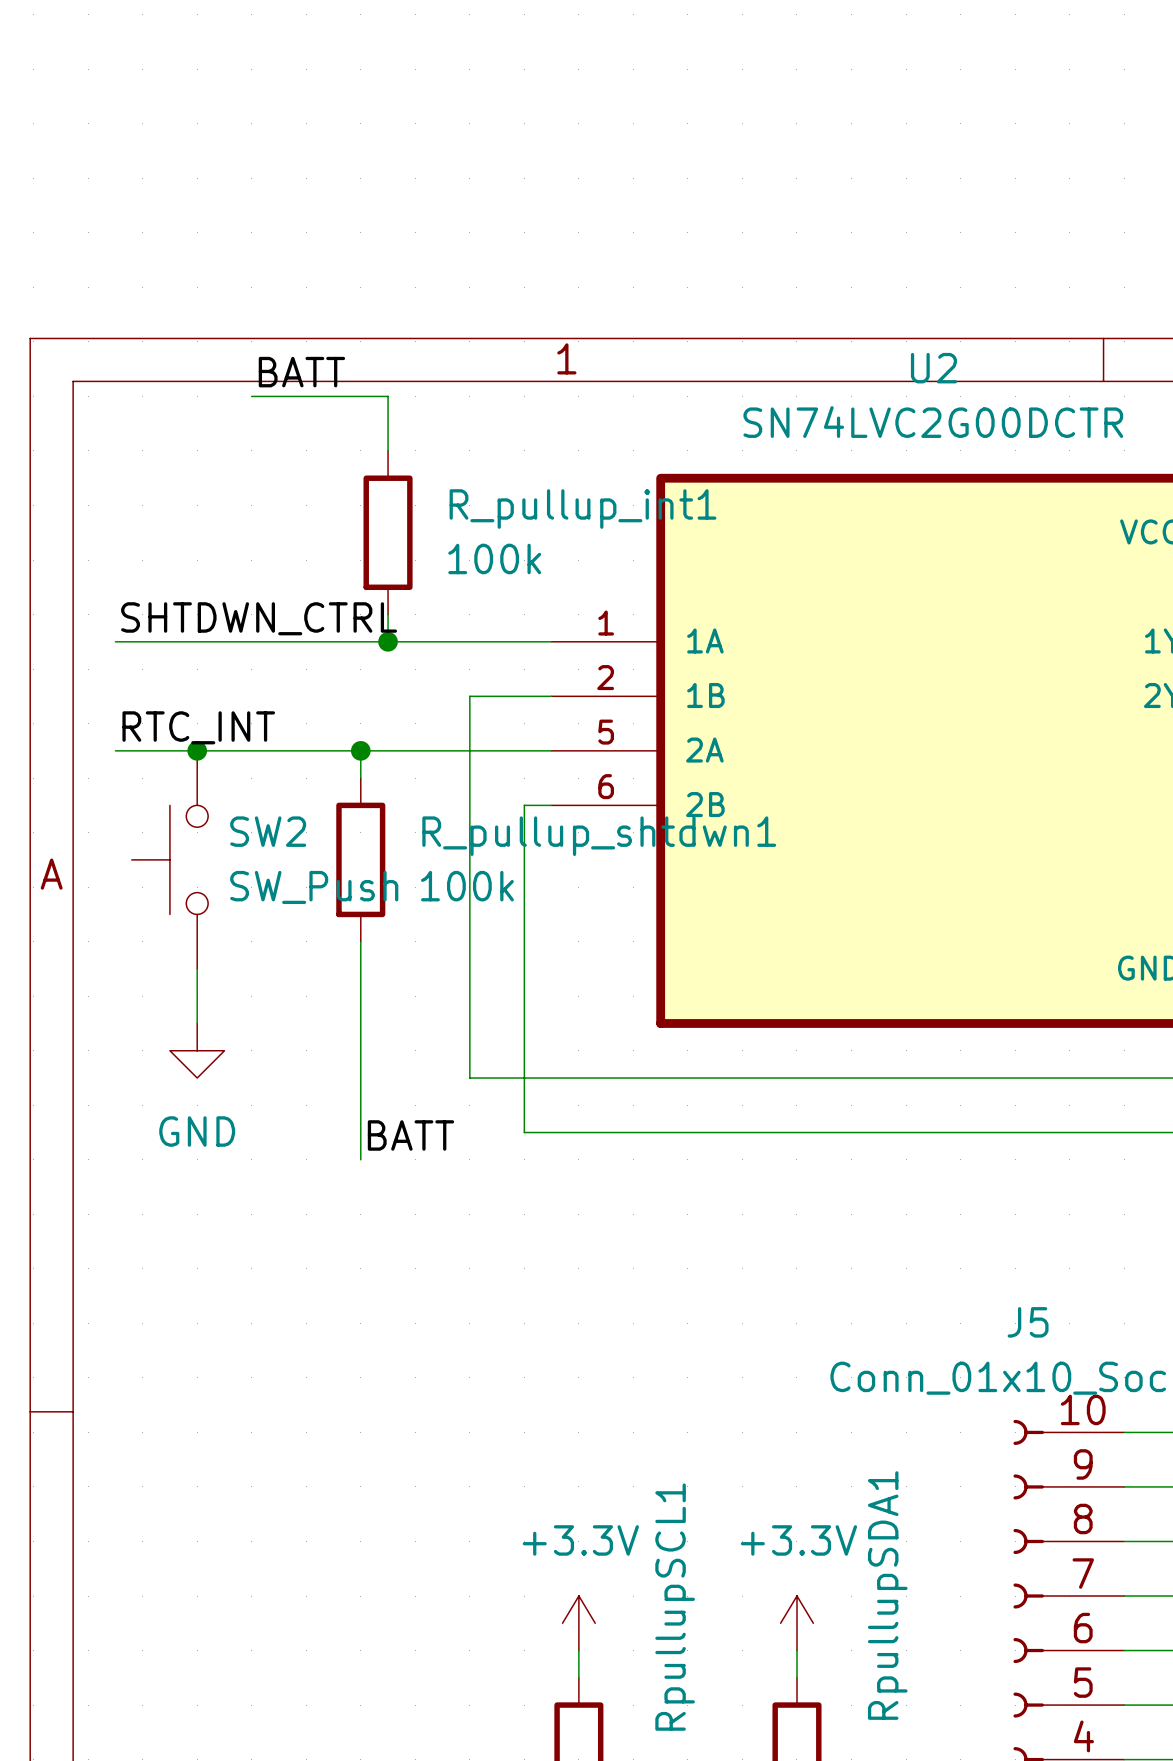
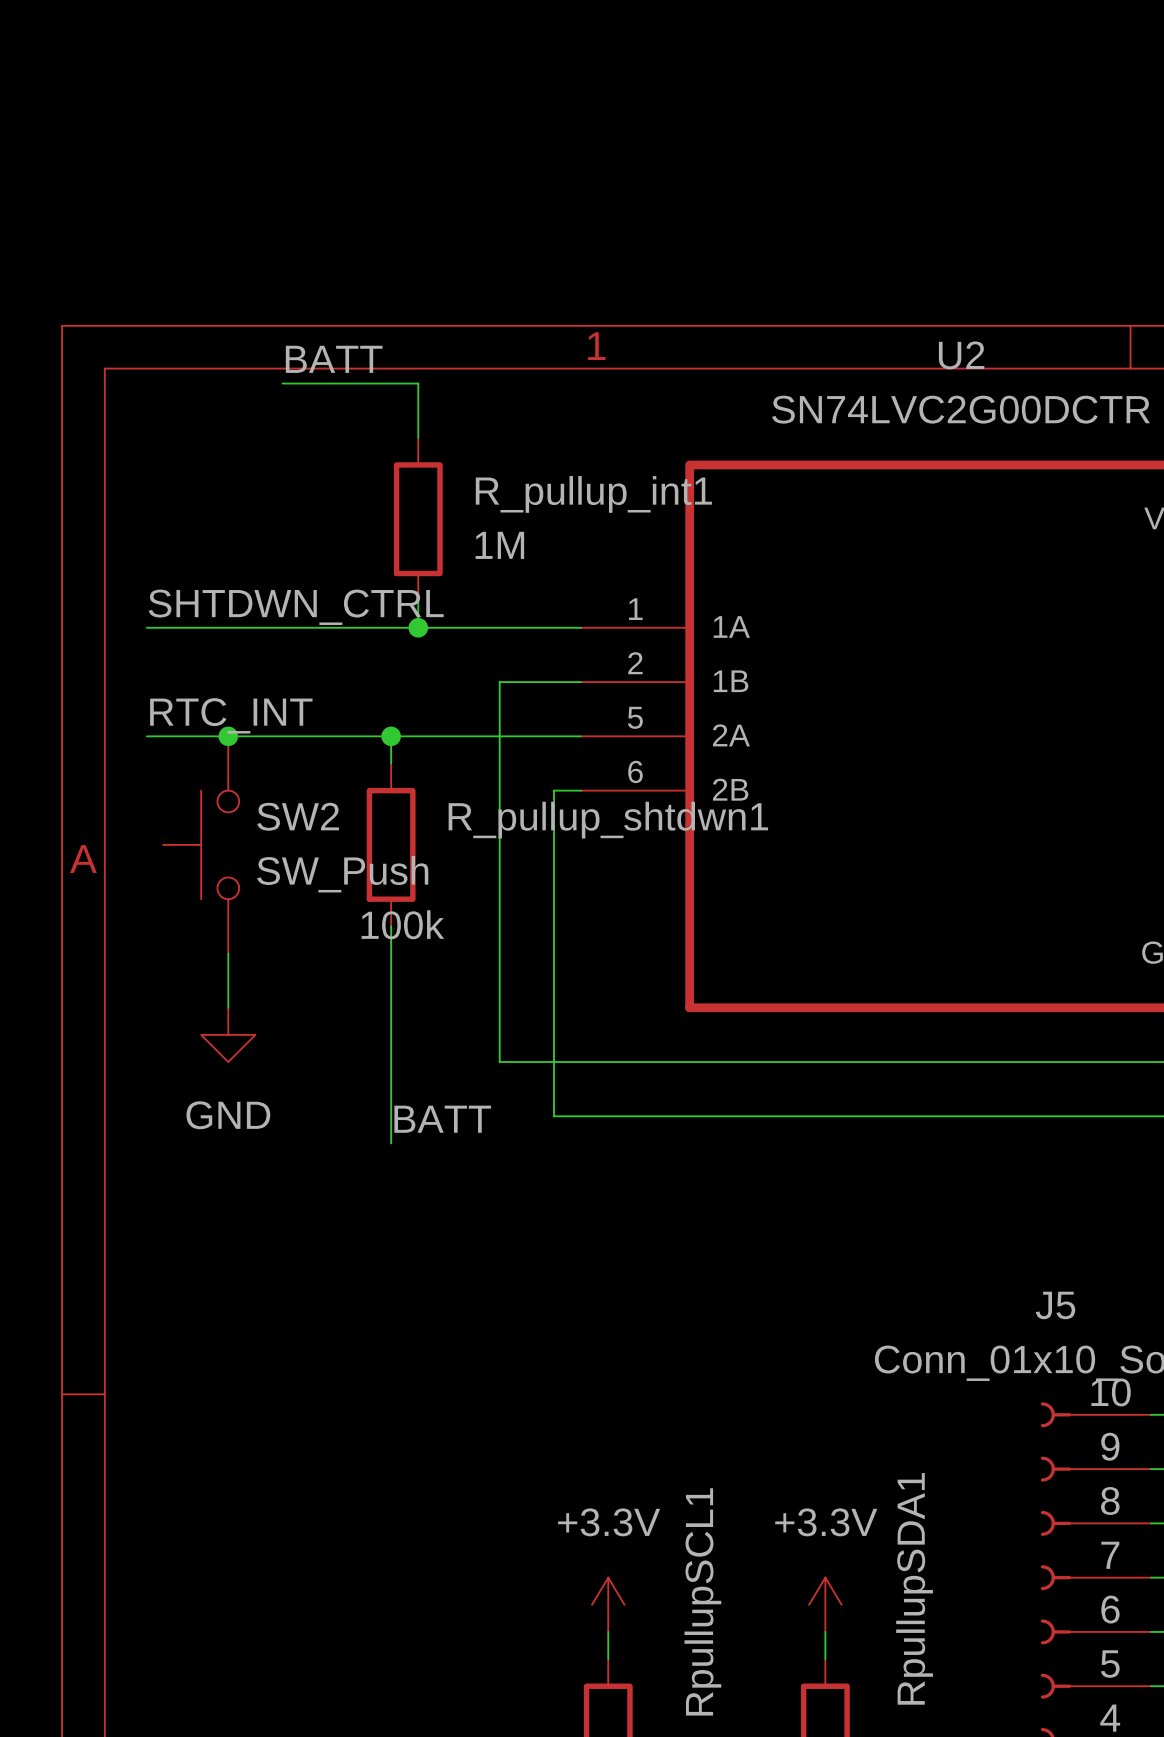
R_pullup_int1 value: 100k (494, 558) -> 1M (499, 545)
R_pullup_shtdwn1 value position: 100k (467, 886) -> 100k (402, 924)

